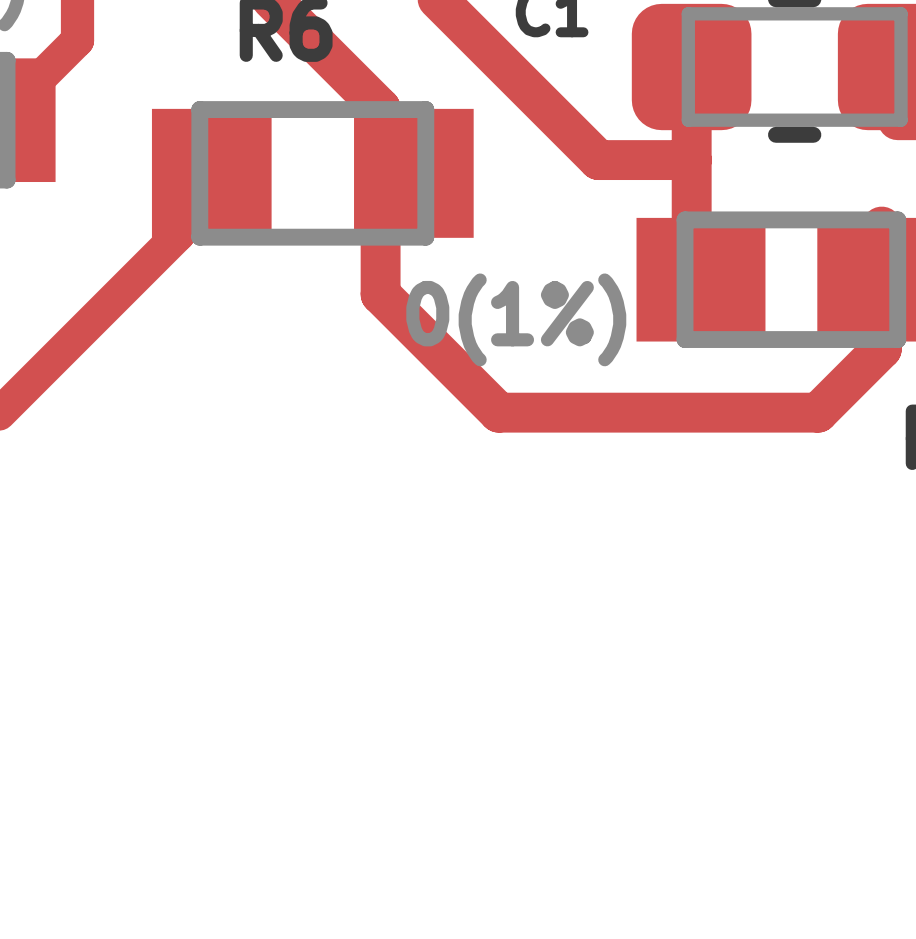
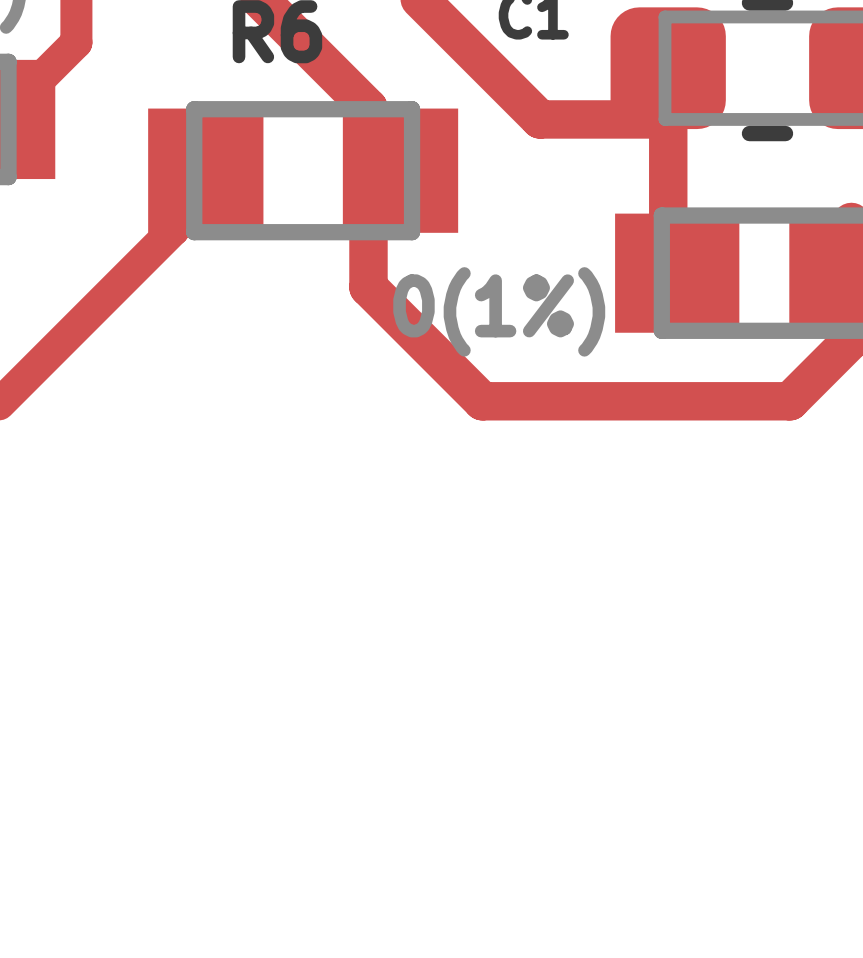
track: (558, 120) (598, 160) (691, 160) -> (540, 119) (668, 119)

